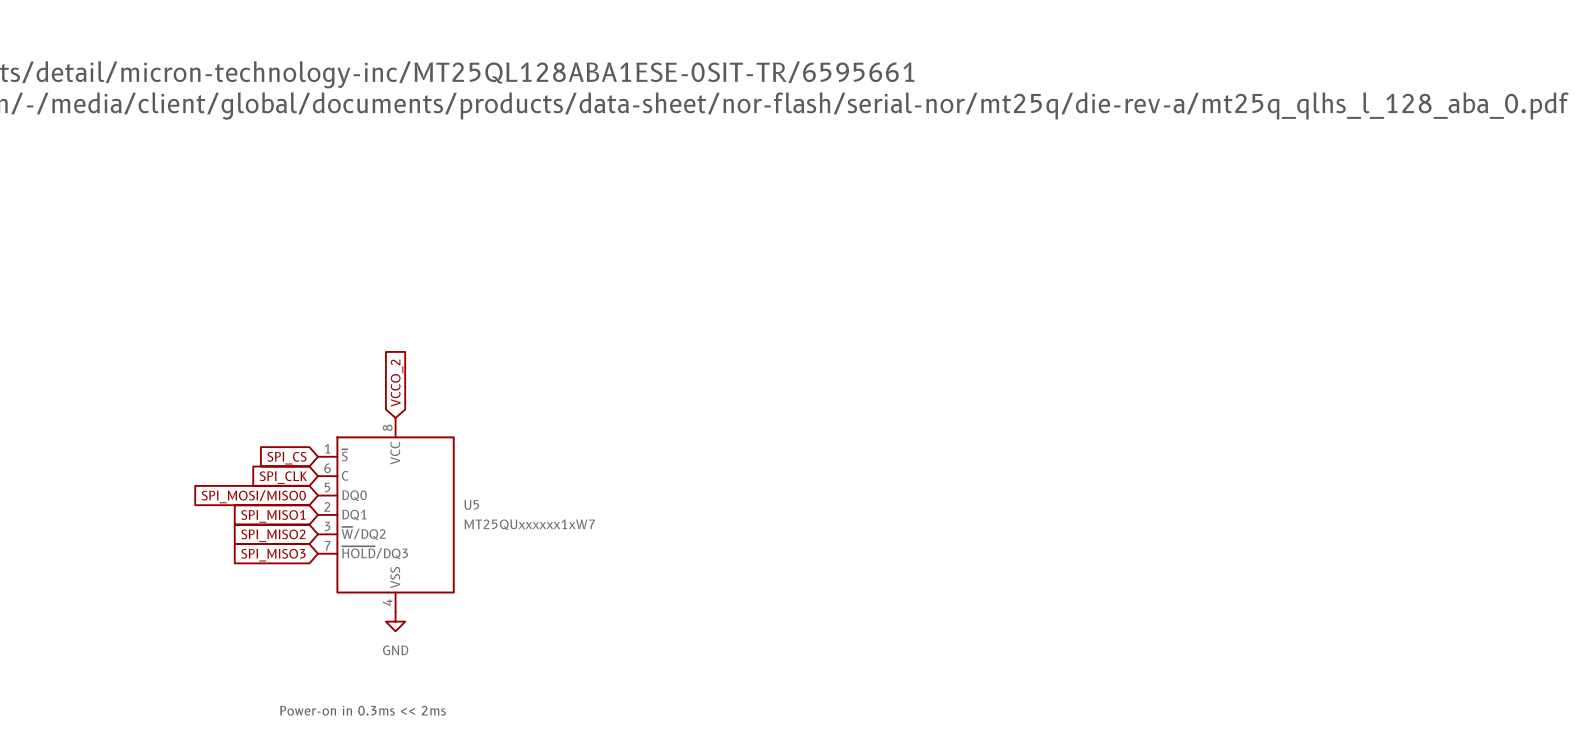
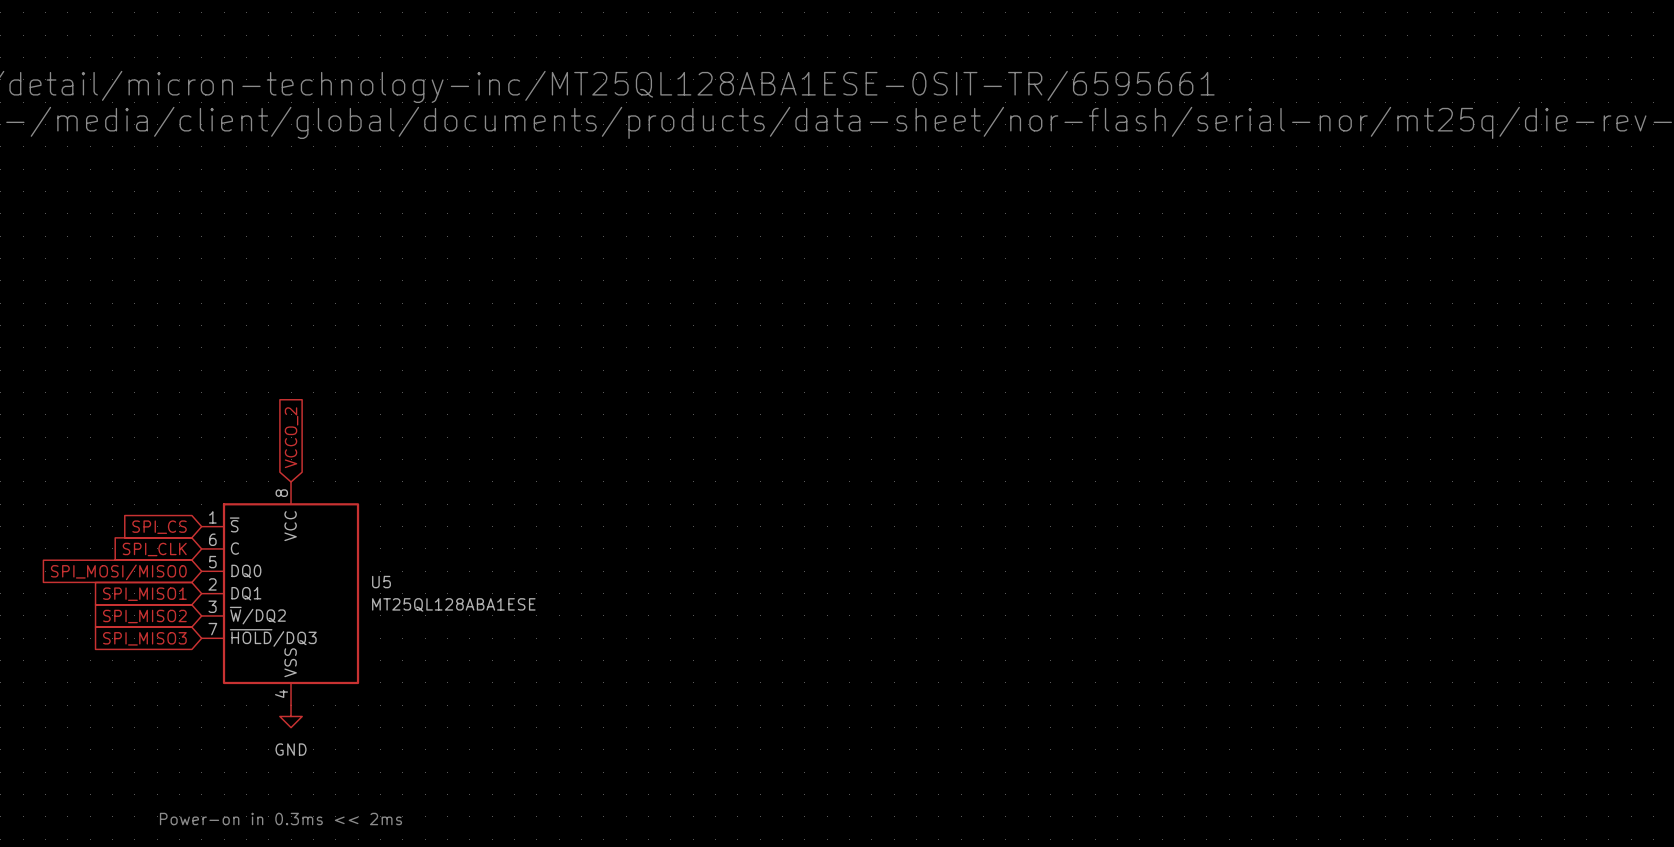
U5 value: MT25QUxxxxxx1xW7 (529, 524) -> MT25QL128ABA1ESE (453, 604)

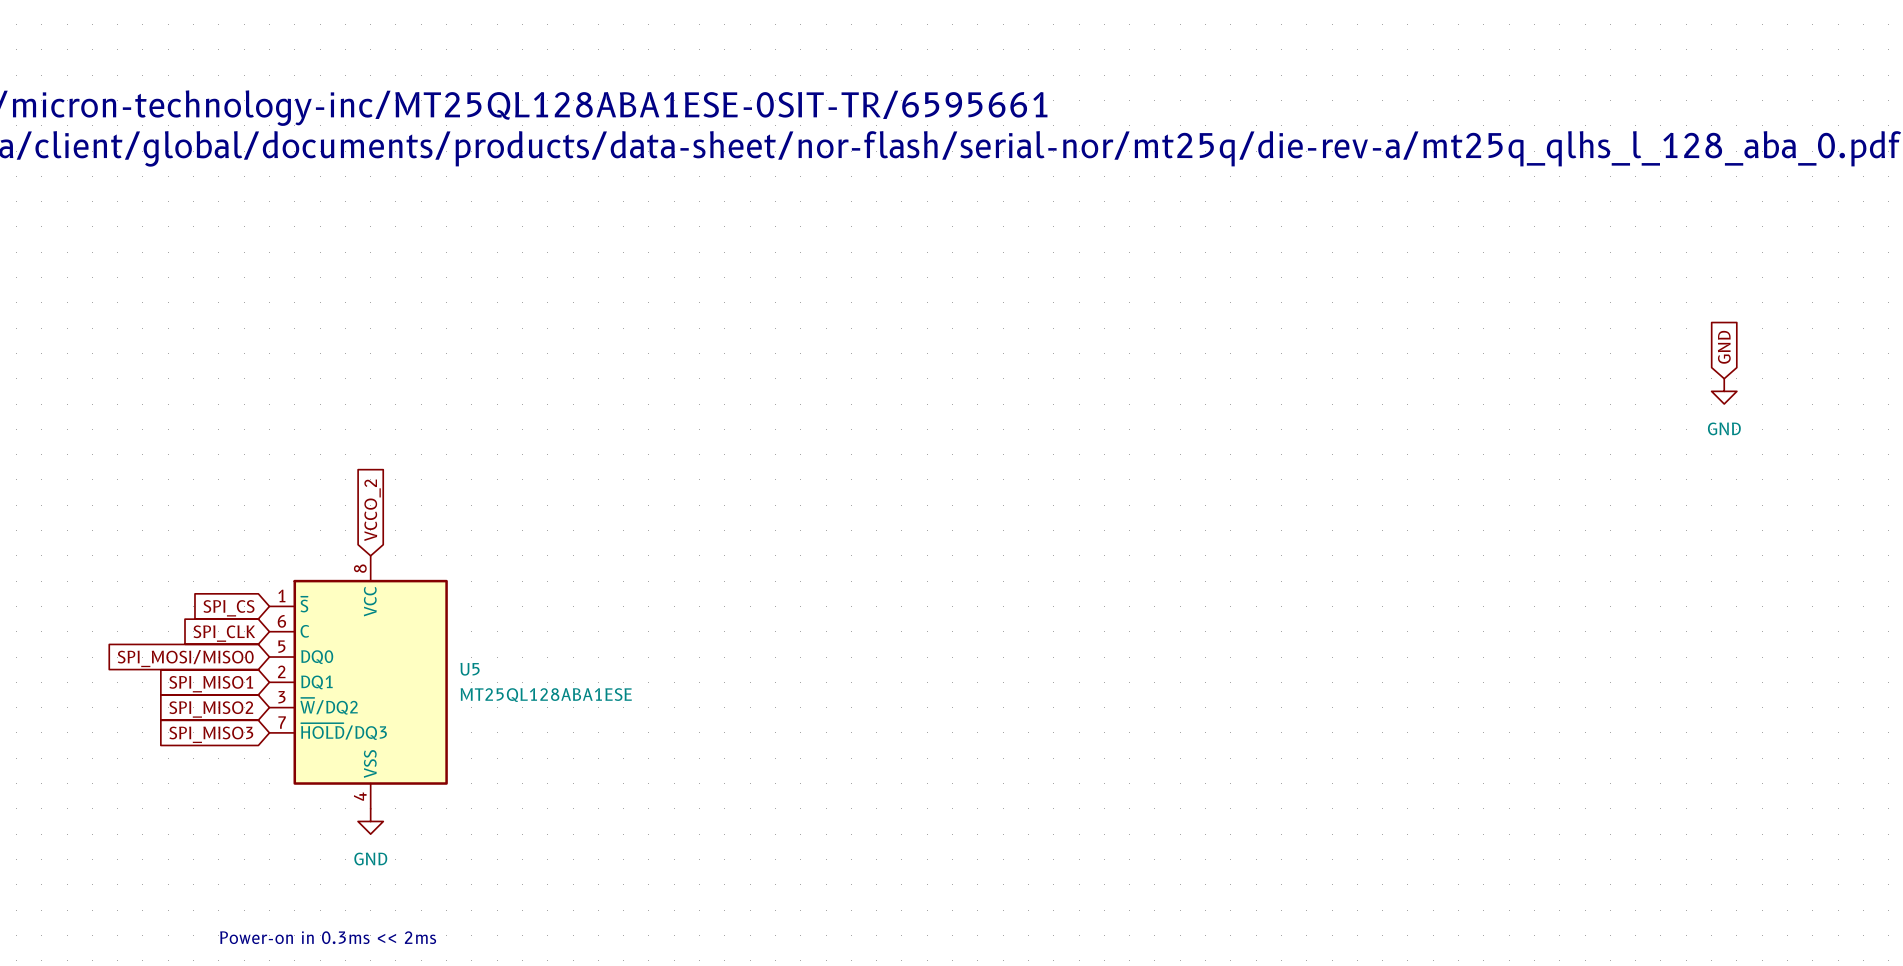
global label: none -> GND (1724, 347)
power symbol: none -> GND (1724, 391)

